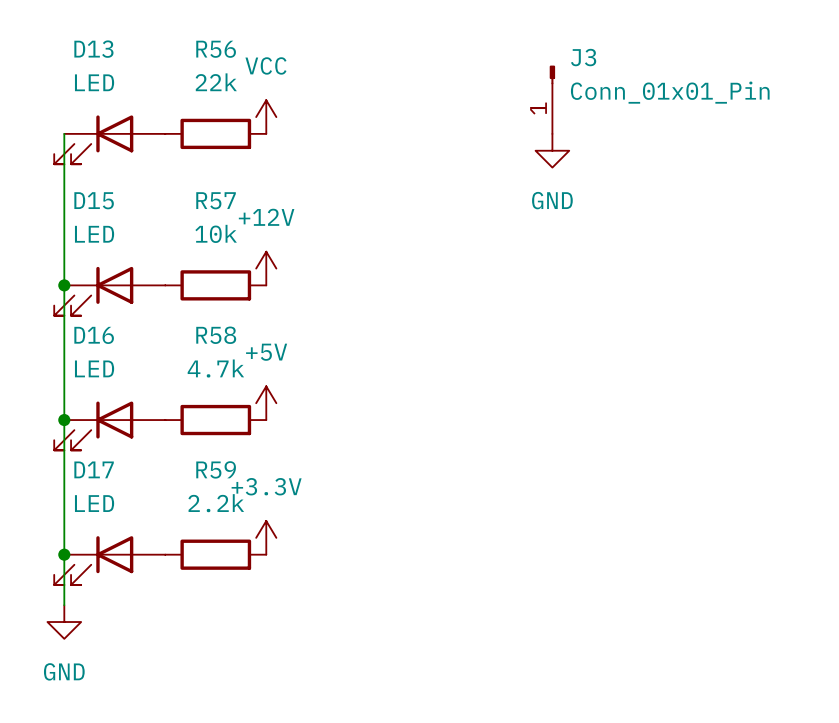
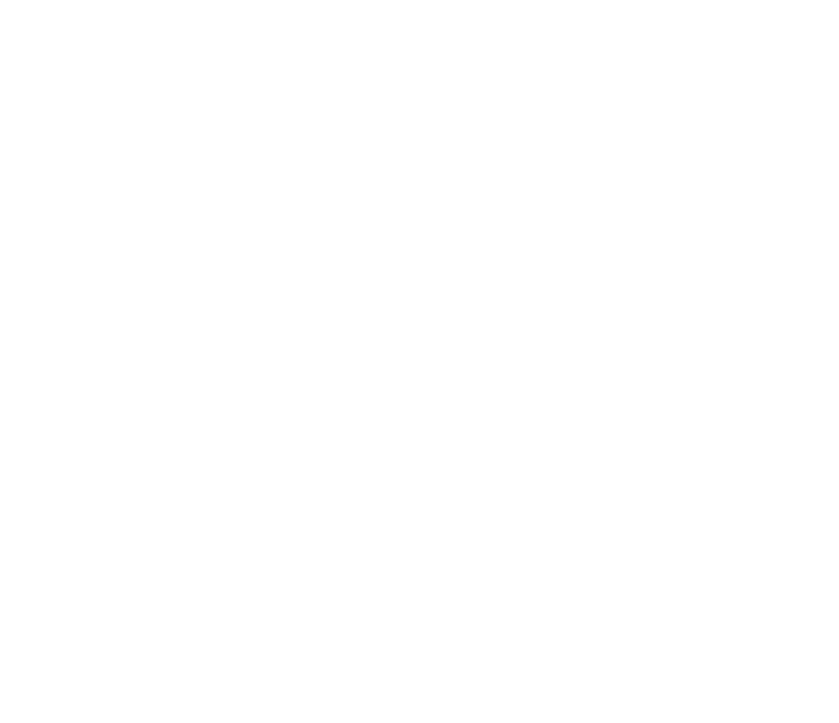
J3: Conn_01x01_Pin (552, 99) -> none
power symbol: VCC (266, 117) -> none
wire: (64, 133) (64, 605) -> none
R56: 22k (215, 133) -> none
D13: LED (109, 139) -> none
power symbol: GND (552, 150) -> none
power symbol: +12V (266, 268) -> none
junction: (64, 285) -> none
R57: 10k (215, 285) -> none
D15: LED (109, 291) -> none
power symbol: +5V (266, 403) -> none
junction: (64, 420) -> none
R58: 4.7k (215, 420) -> none
D16: LED (109, 425) -> none
power symbol: +3.3V (266, 537) -> none
junction: (64, 554) -> none
R59: 2.2k (215, 554) -> none
D17: LED (109, 560) -> none
power symbol: GND (64, 622) -> none

